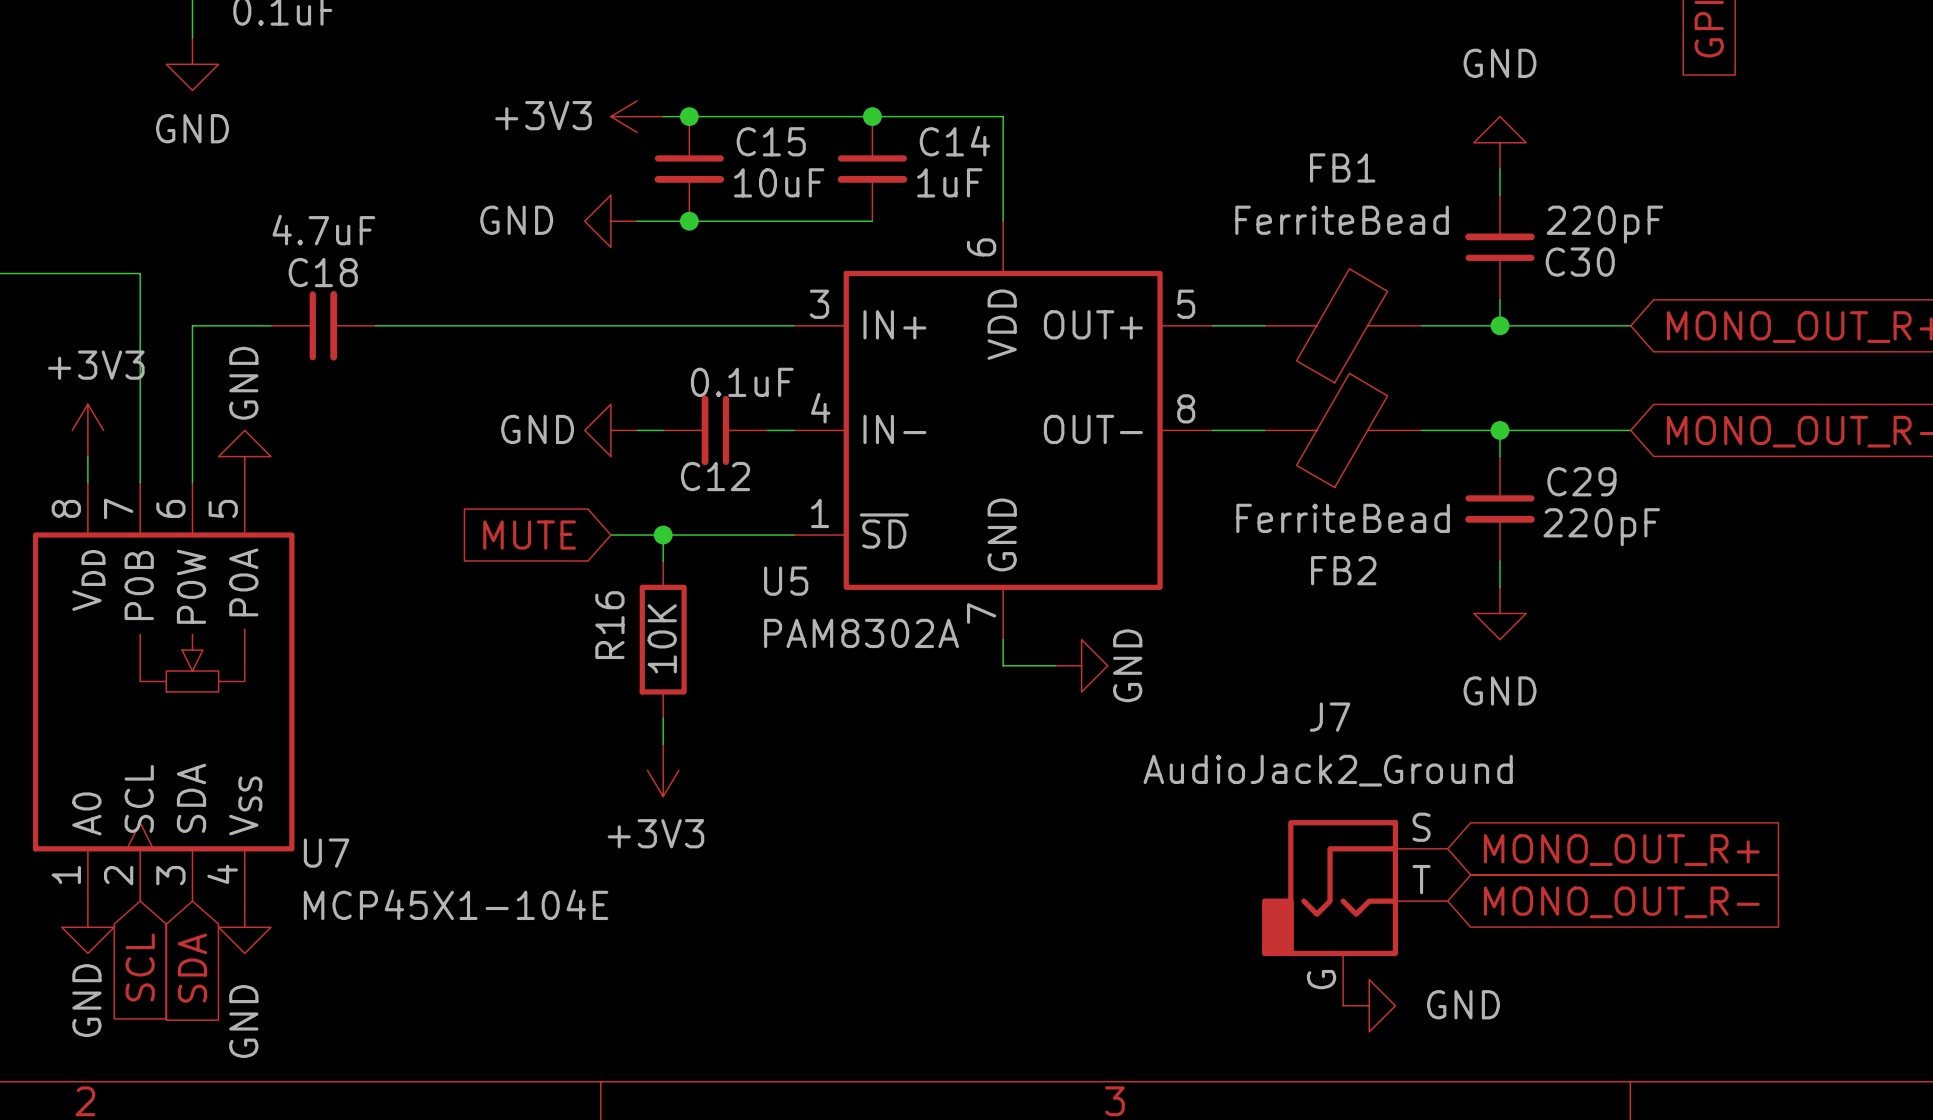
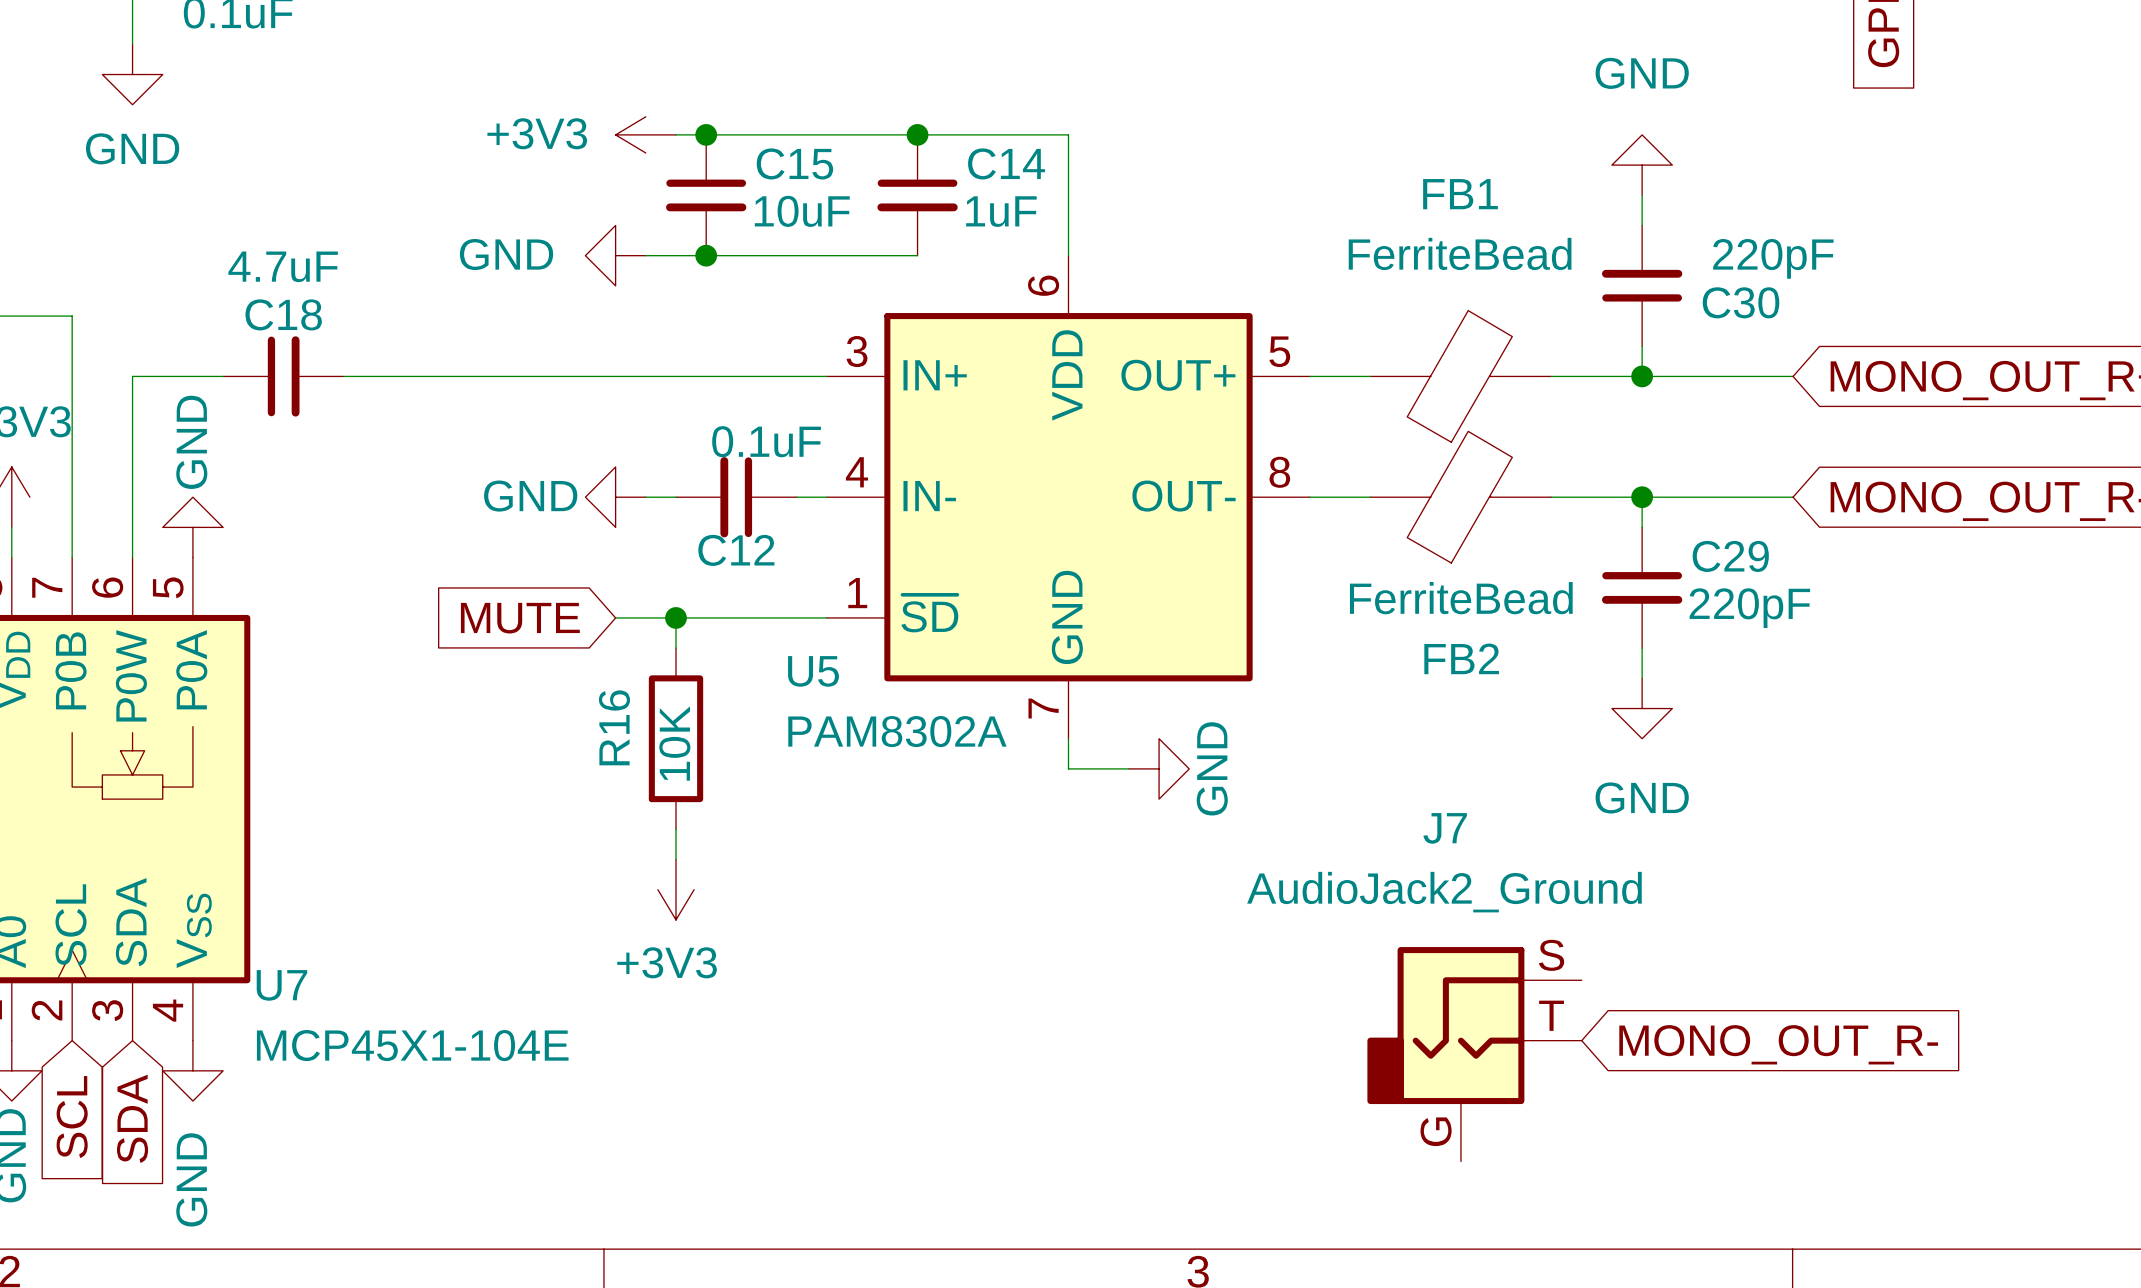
global label: MONO_OUT_R+ (1621, 850) -> none
power symbol: GND (1369, 1005) -> none

